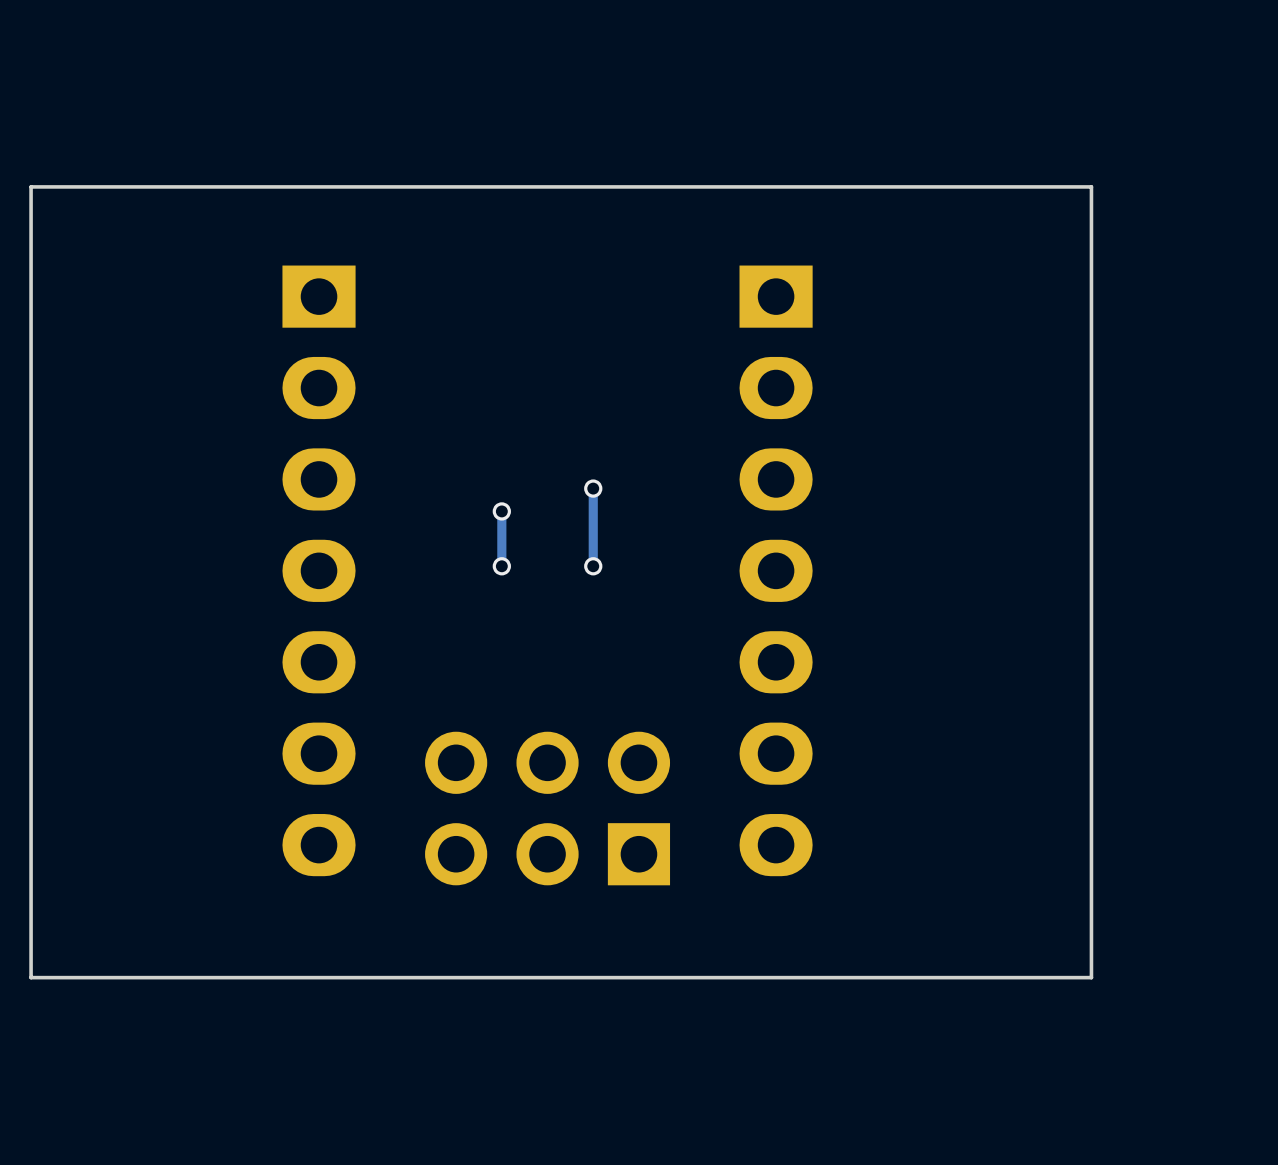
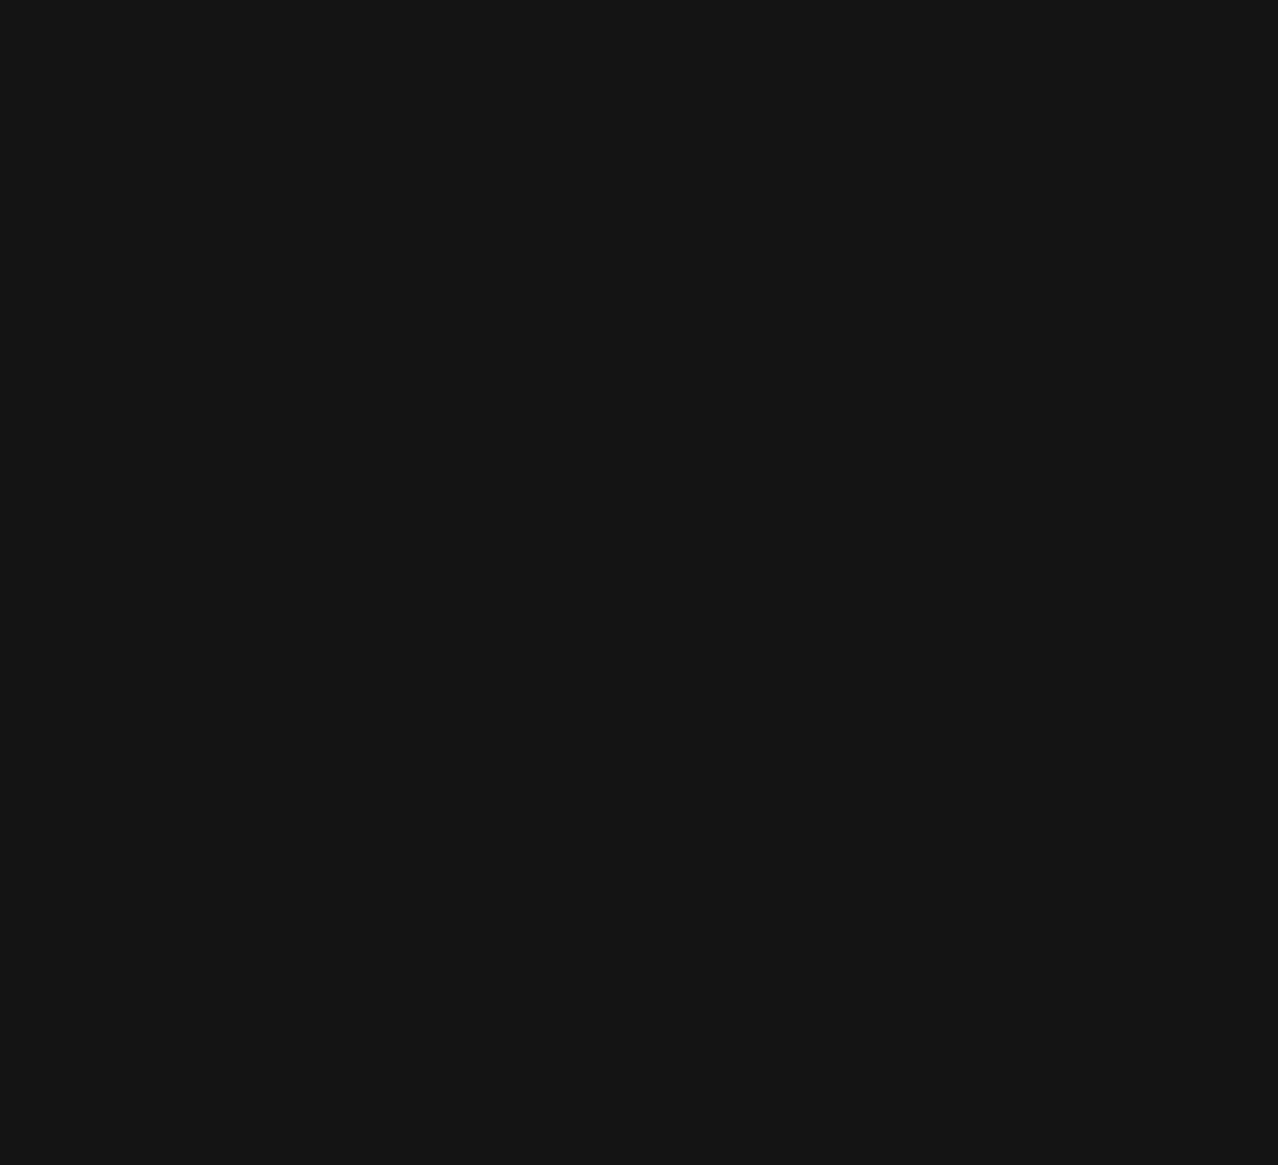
board edge: (1091, 186) (1091, 977) (31, 977) (31, 186) (1091, 186) -> none
track: (593, 488) (593, 566) -> none
via: (593, 488) -> none
track: (501, 511) (501, 566) -> none
via: (501, 511) -> none
via: (501, 566) -> none
via: (593, 566) -> none
part: (319, 570) -> none
part: (776, 570) -> none
part: (547, 808) -> none

